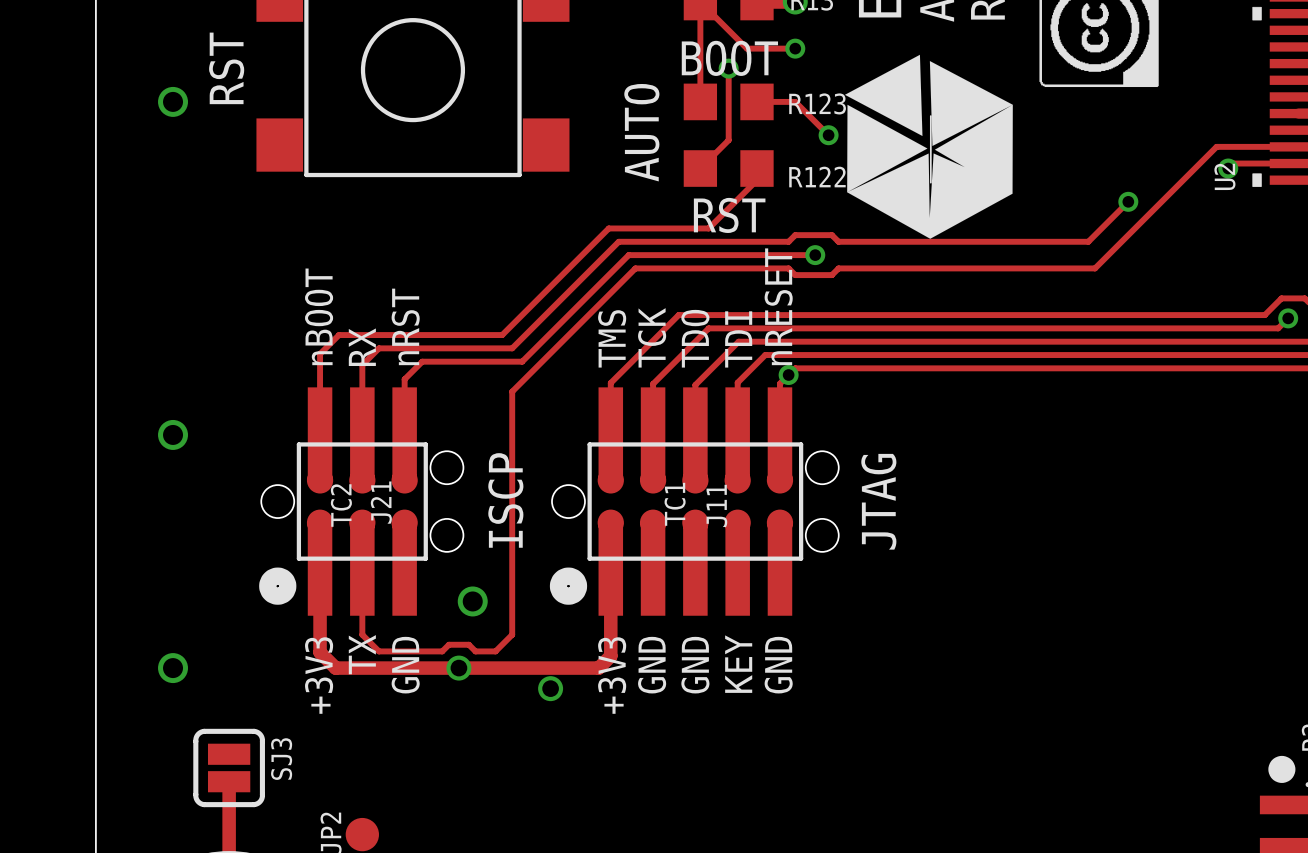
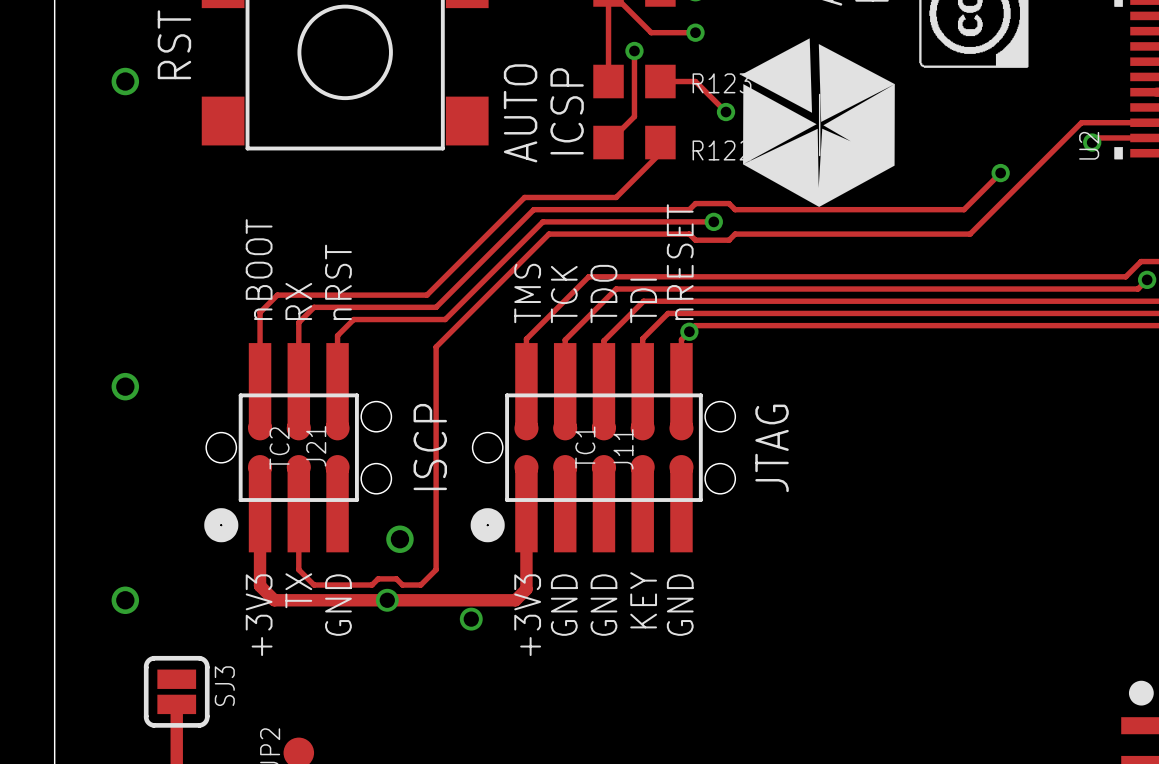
text: BOOT (729, 58) -> none
text position: AUTO (641, 132) -> AUTO (520, 113)
text: none -> ICSP (567, 111)
text: RST (729, 215) -> none

